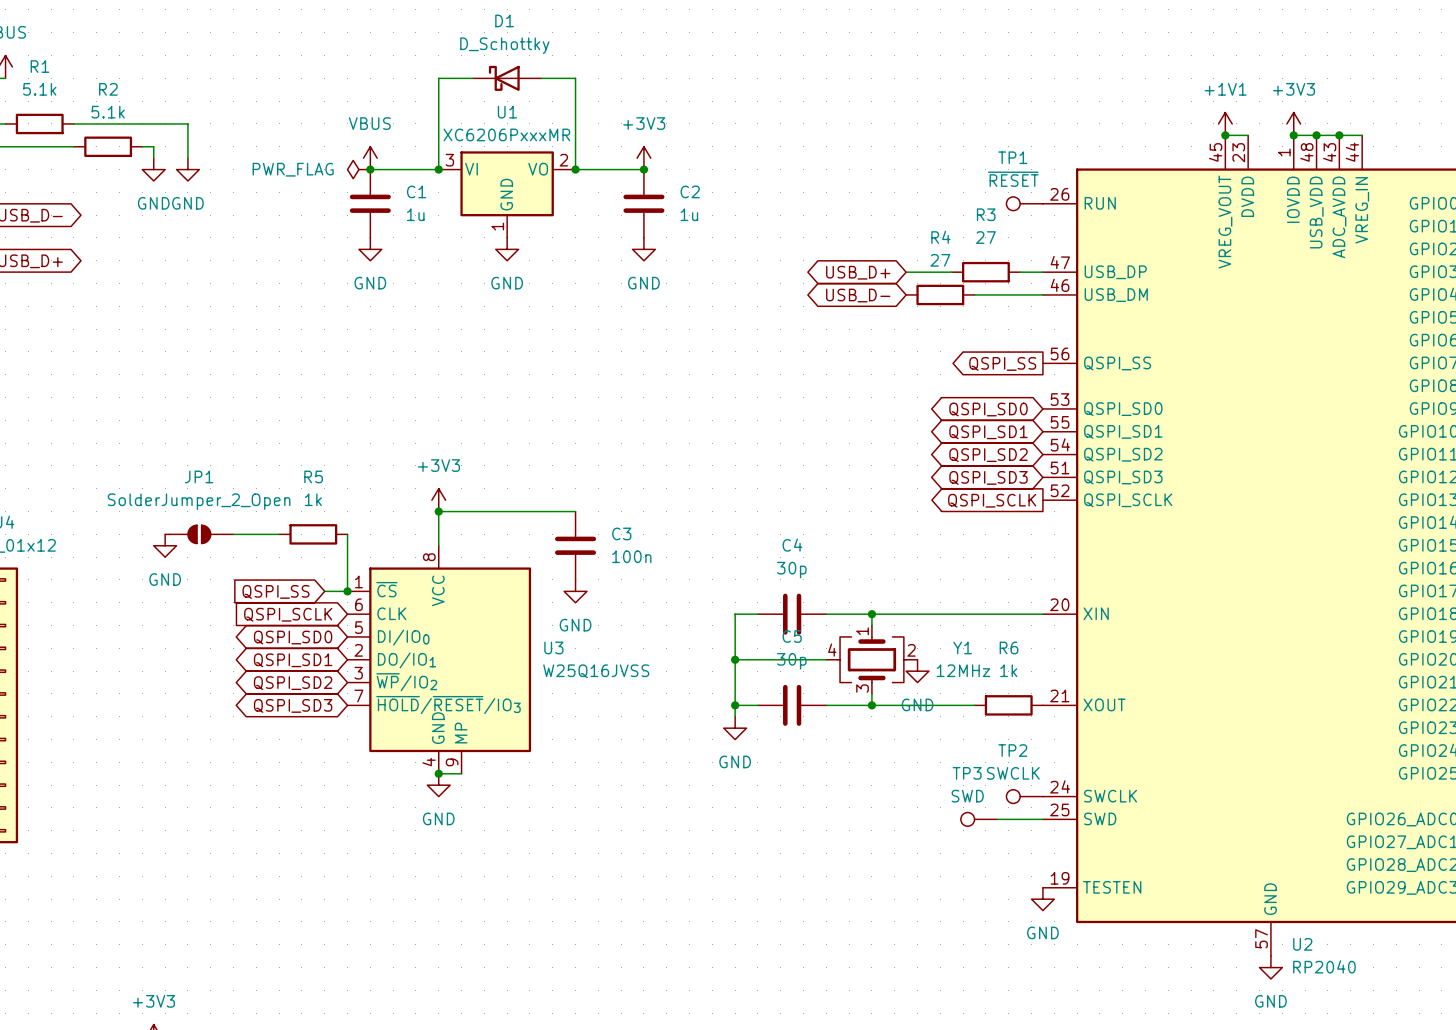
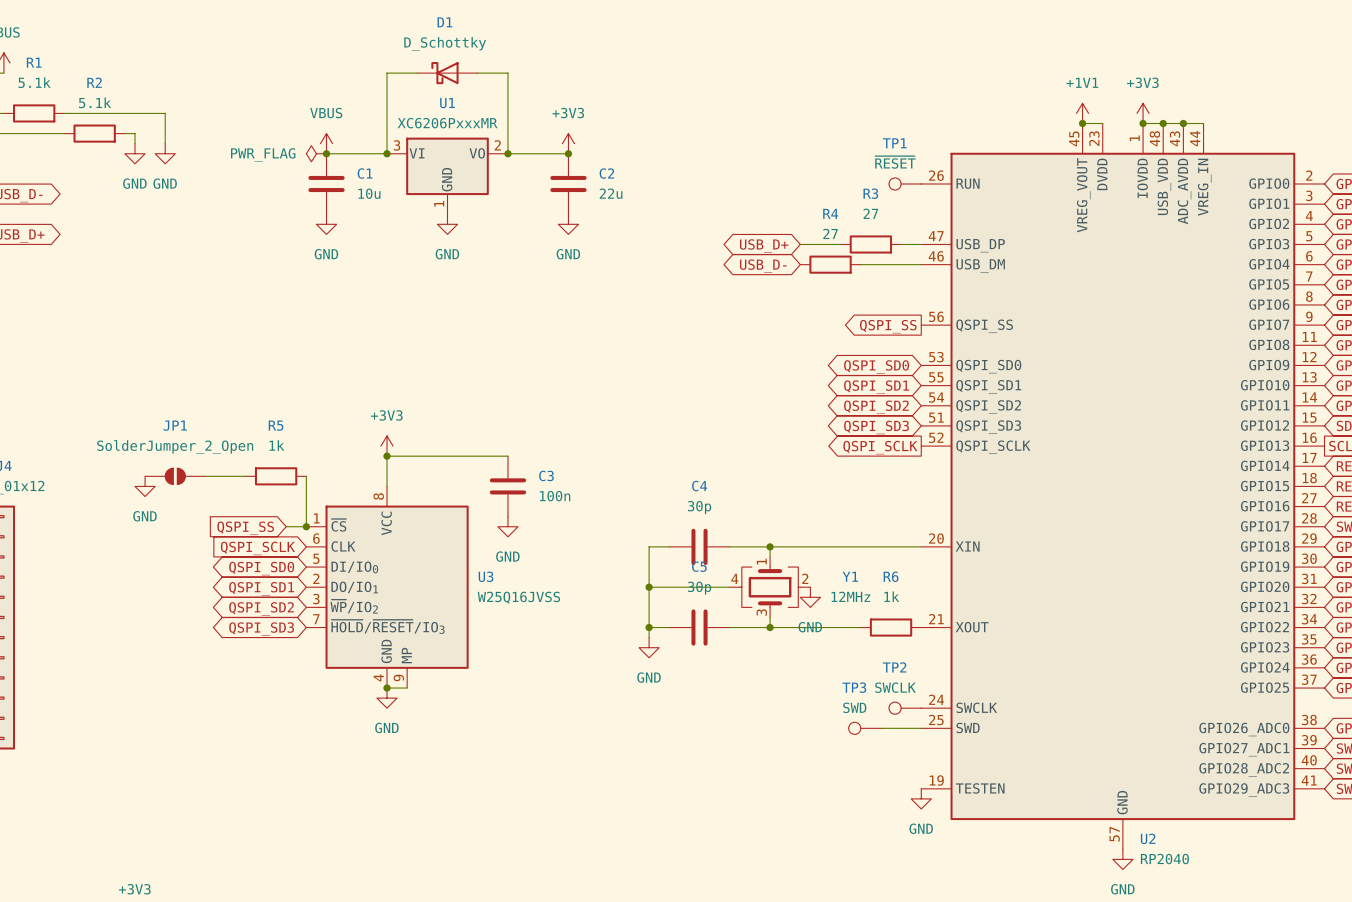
C1 value: 1u (415, 214) -> 10u (369, 193)
C2 value: 1u (689, 214) -> 22u (611, 193)

